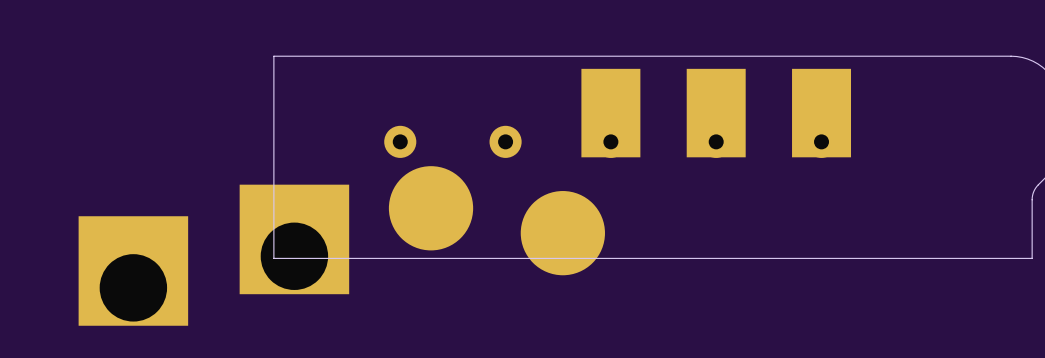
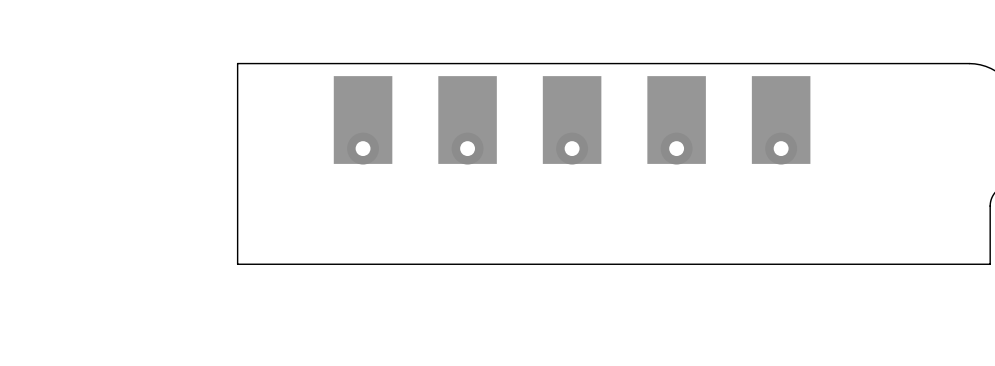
part: none -> (363, 120)
part: none -> (467, 120)
part: (431, 208) -> none
part: (562, 233) -> none
part: (294, 239) -> none
part: (133, 270) -> none

